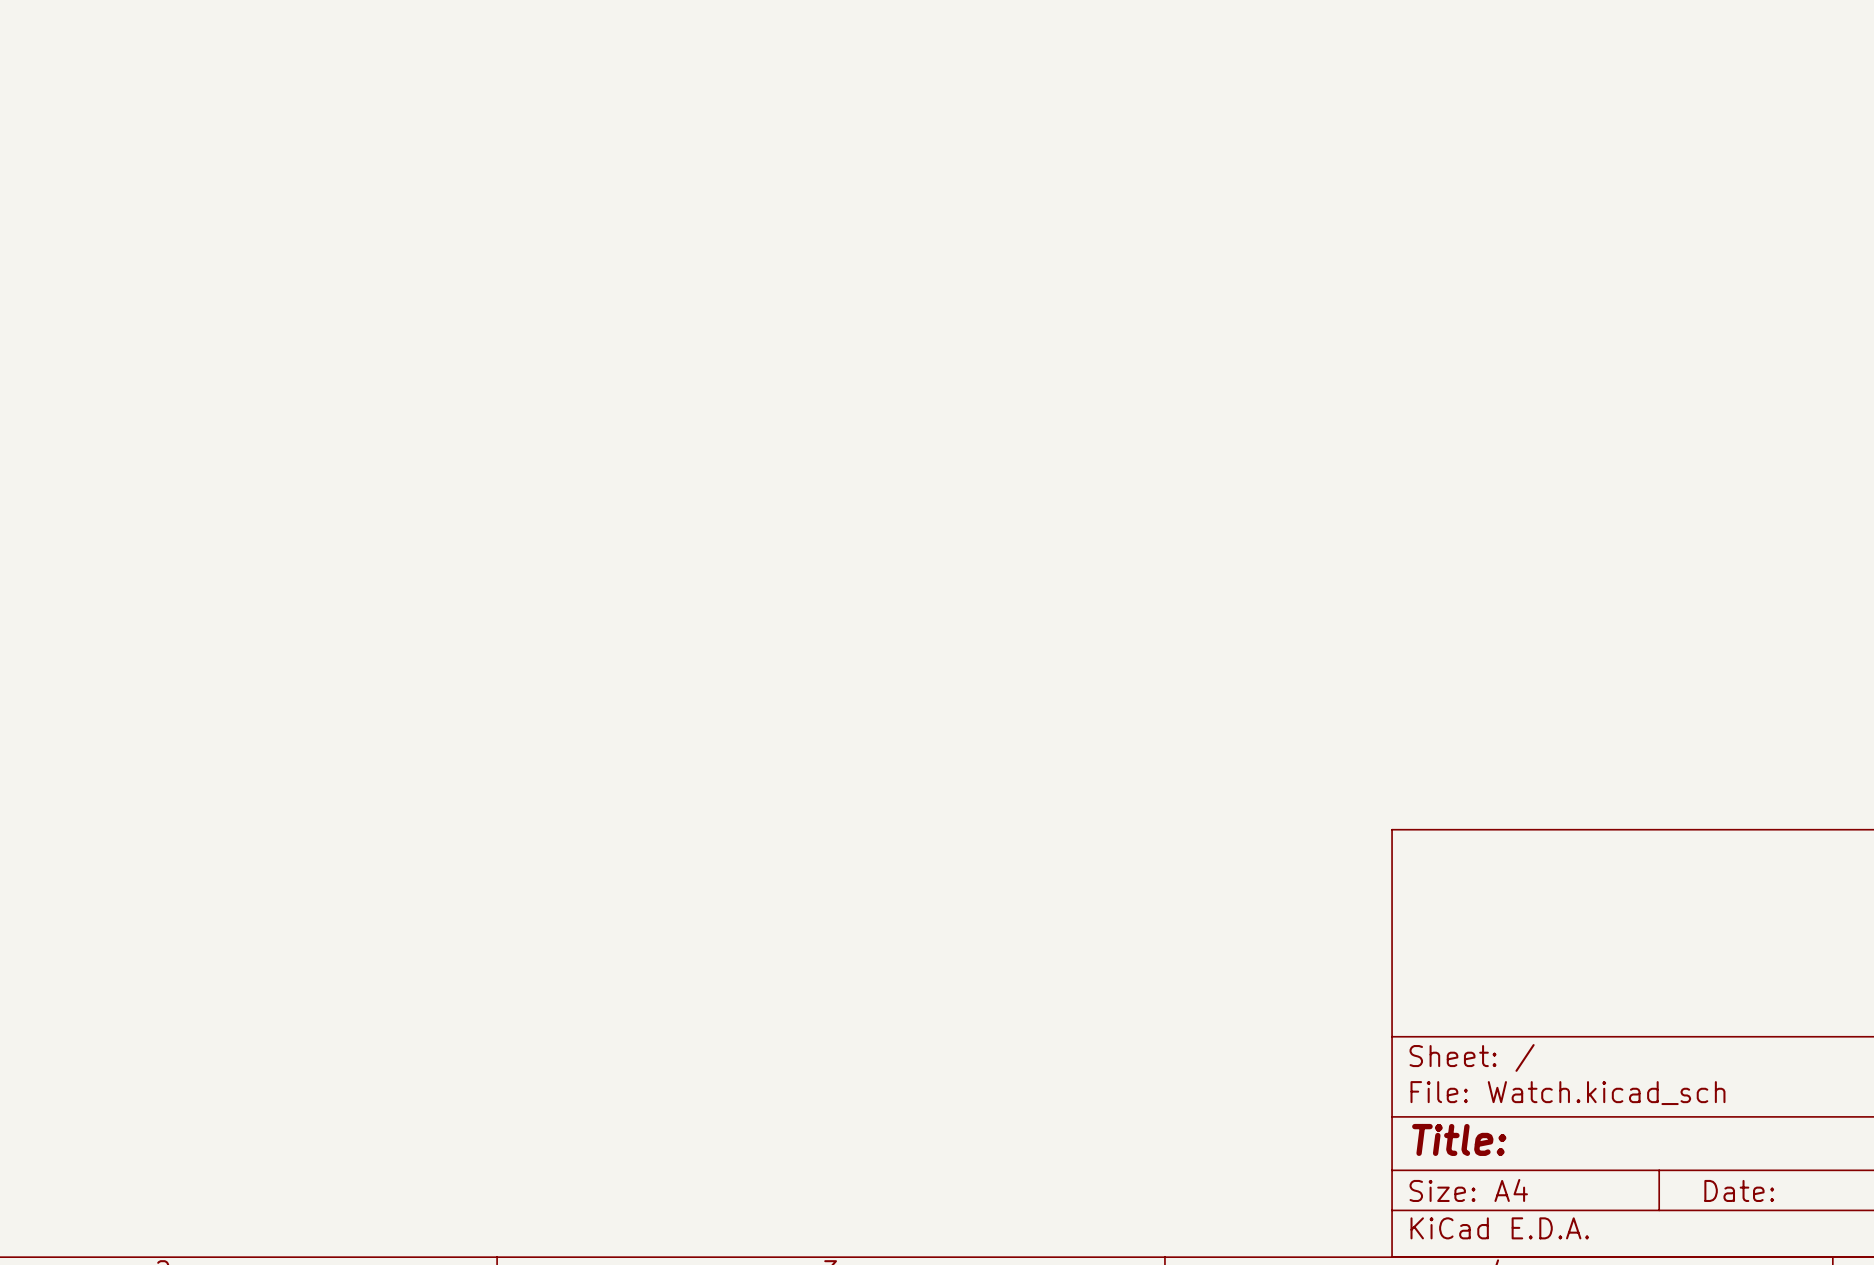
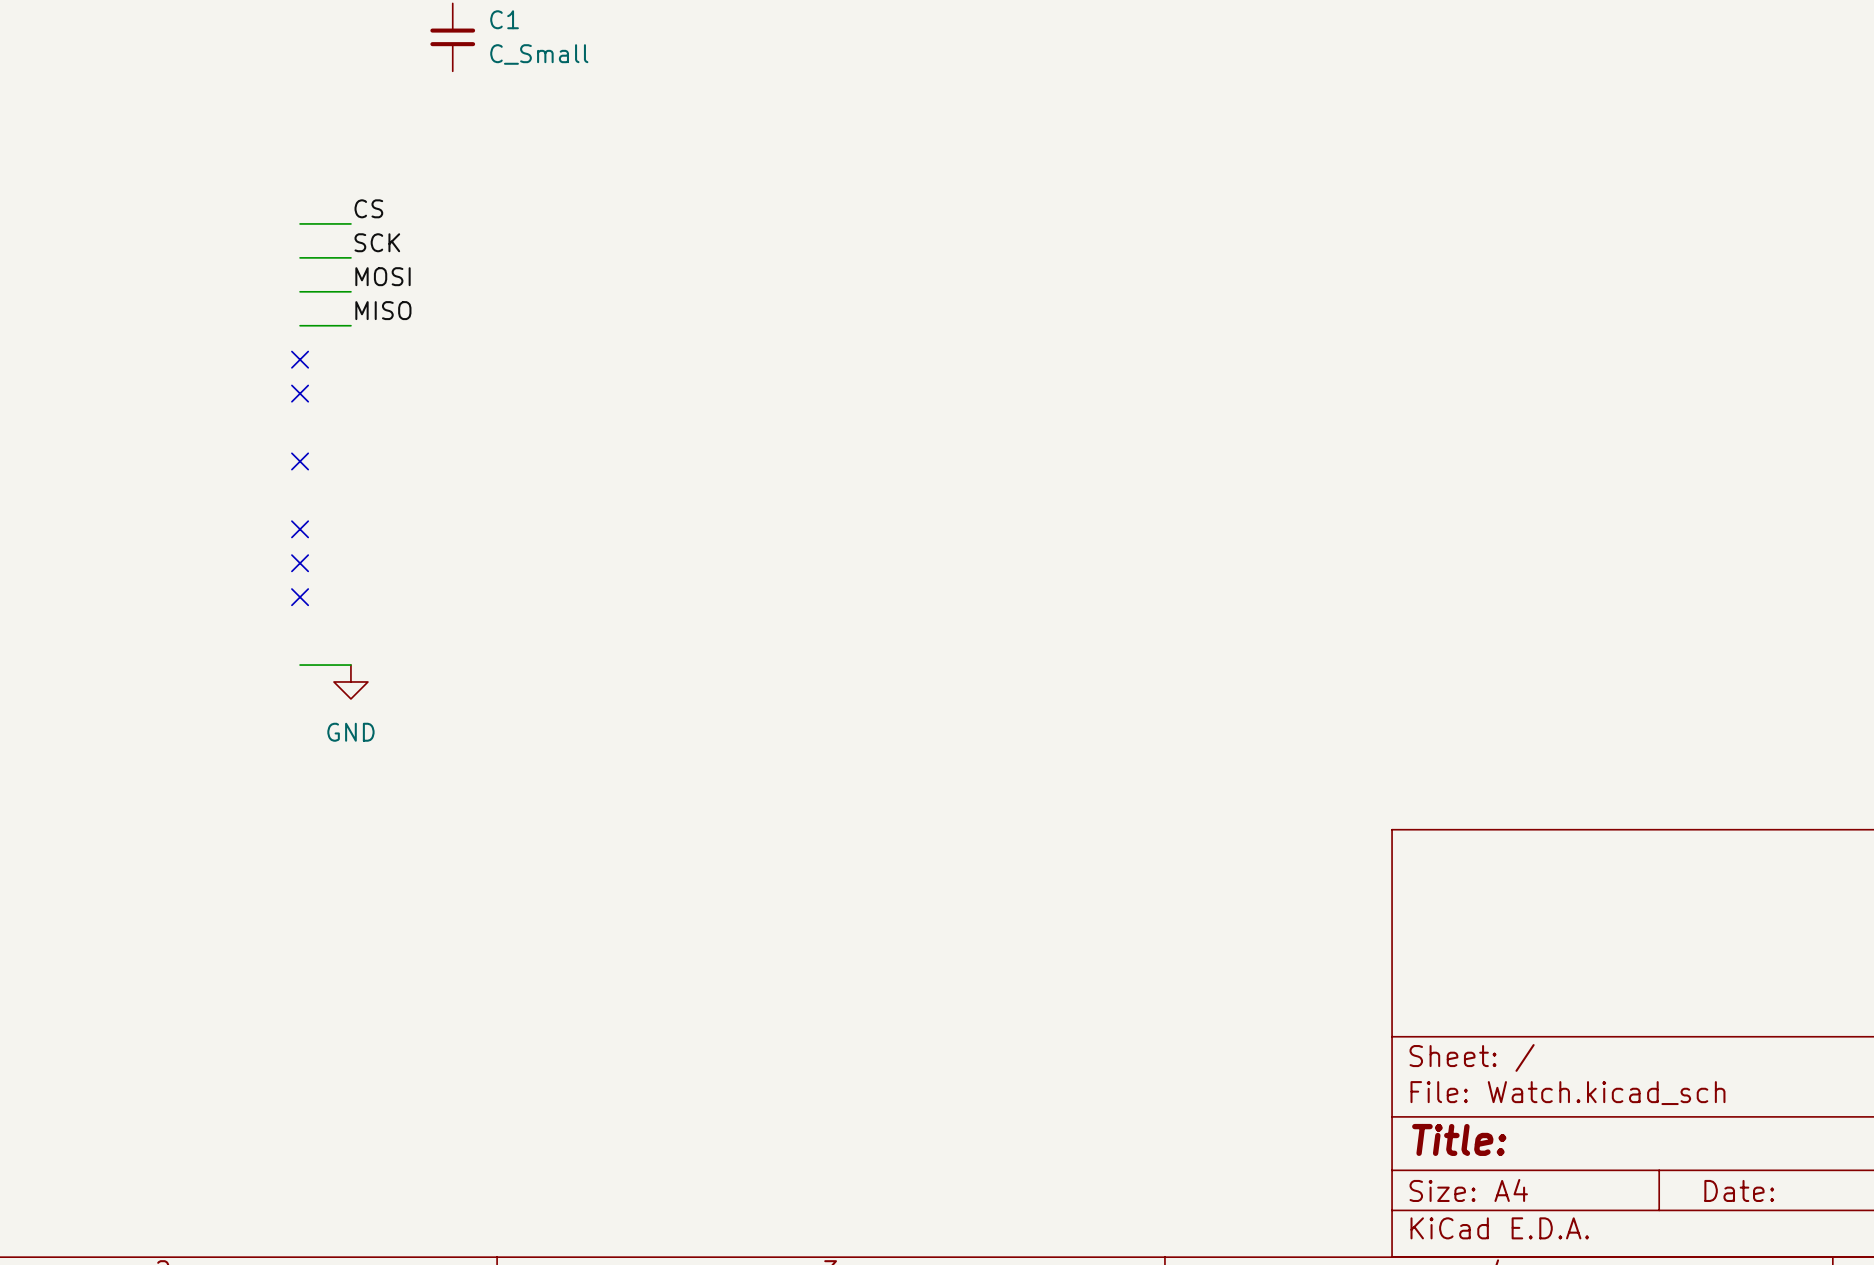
C1: none -> C_Small (452, 37)
label: none -> CS (368, 208)
wire: none -> (300, 223) (350, 223)
label: none -> SCK (377, 242)
wire: none -> (300, 257) (350, 257)
label: none -> MOSI (382, 276)
wire: none -> (300, 291) (350, 291)
label: none -> MISO (383, 310)
wire: none -> (300, 325) (350, 325)
no-connect mark: none -> (300, 359)
no-connect mark: none -> (300, 393)
no-connect mark: none -> (300, 461)
no-connect mark: none -> (300, 529)
no-connect mark: none -> (300, 563)
no-connect mark: none -> (300, 597)
wire: none -> (300, 665) (350, 665)
power symbol: none -> GND (350, 681)

